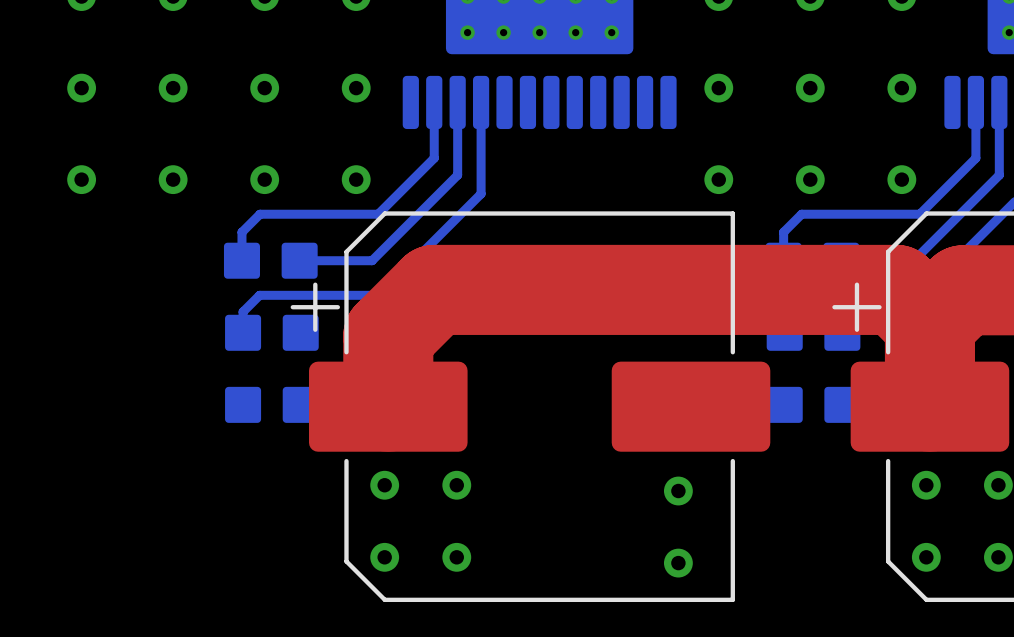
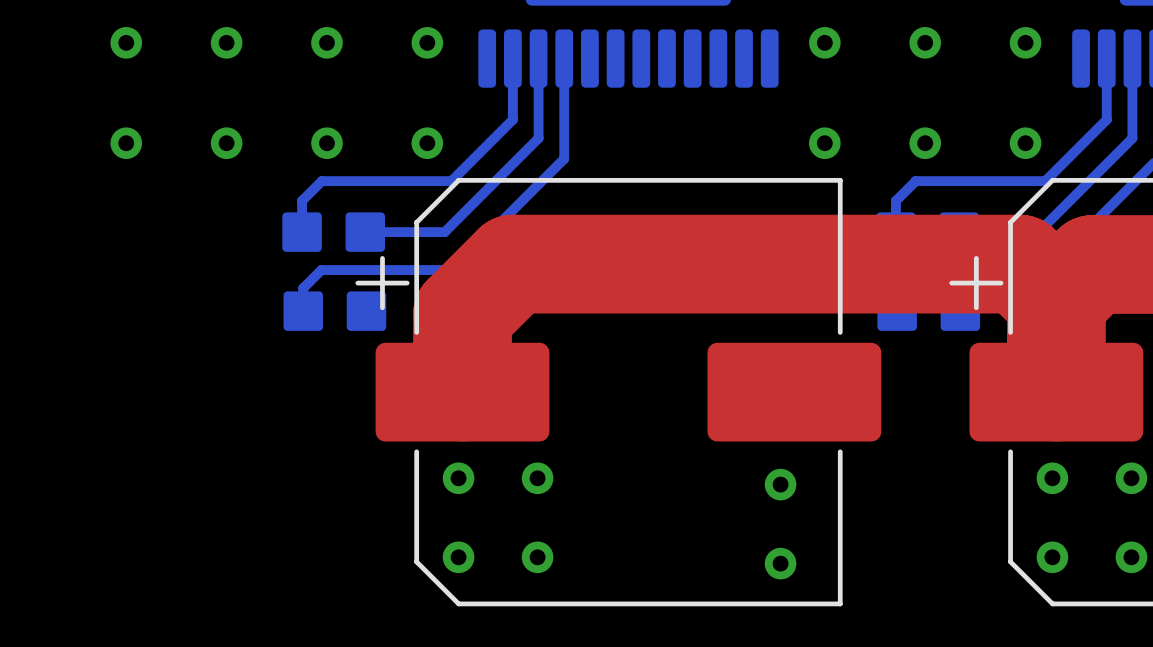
part: (271, 404) -> none
part: (813, 404) -> none

